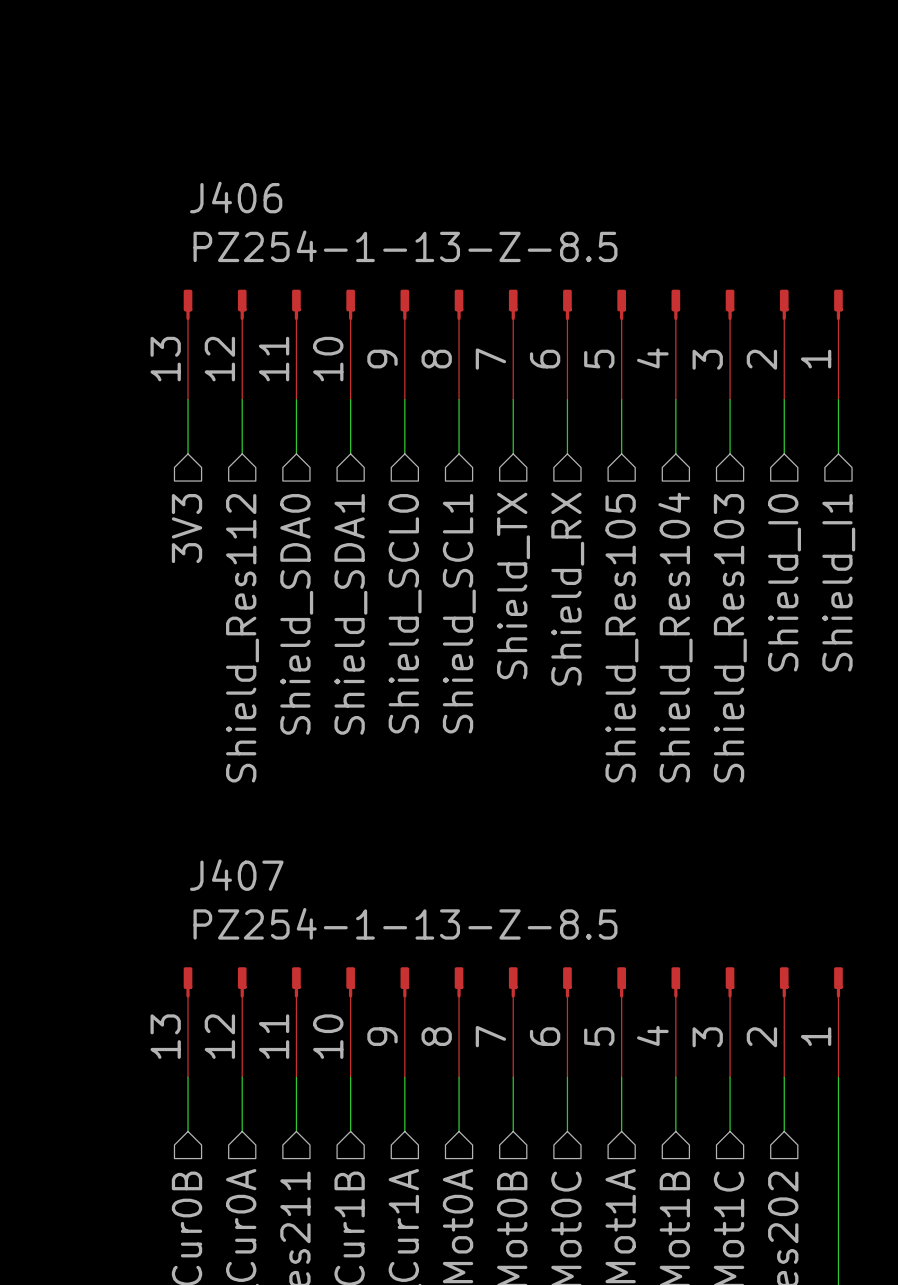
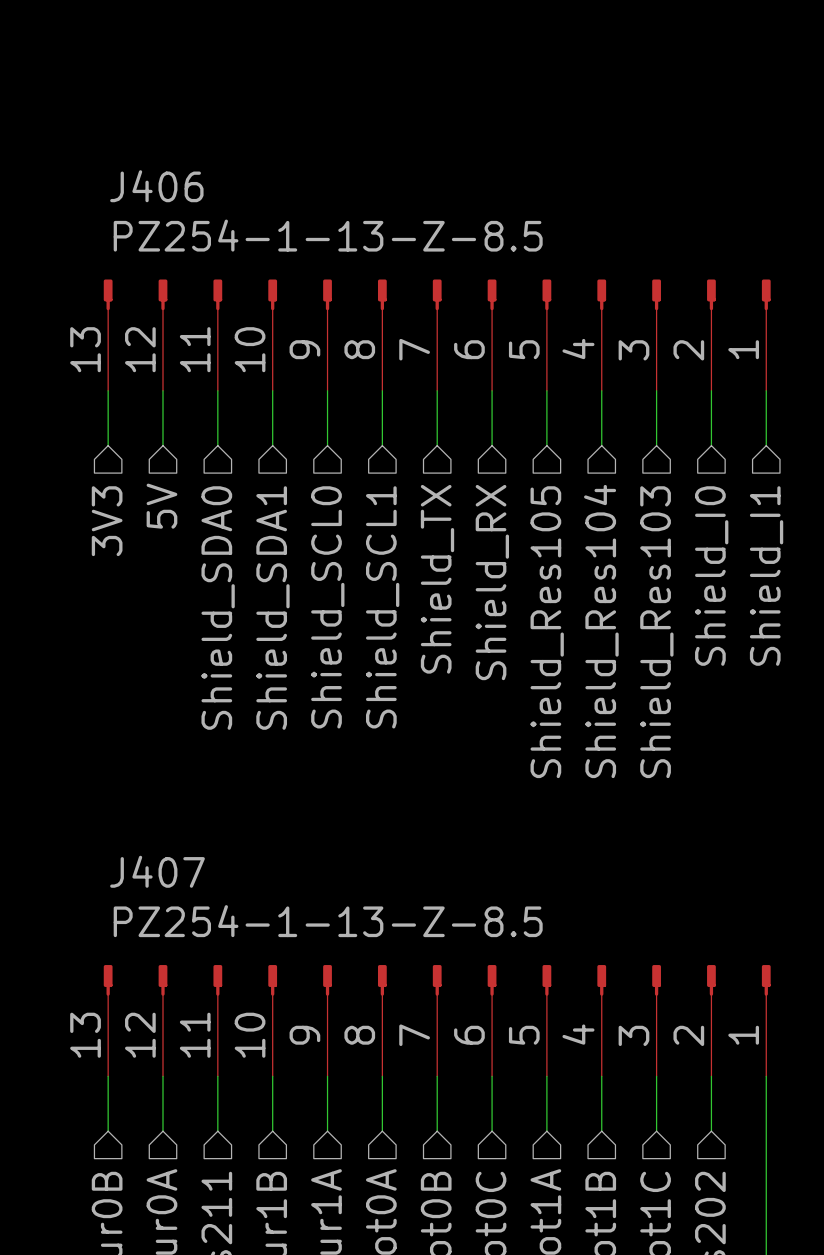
hierarchical label: Shield_Res112 (242, 638) -> 5V (161, 506)

